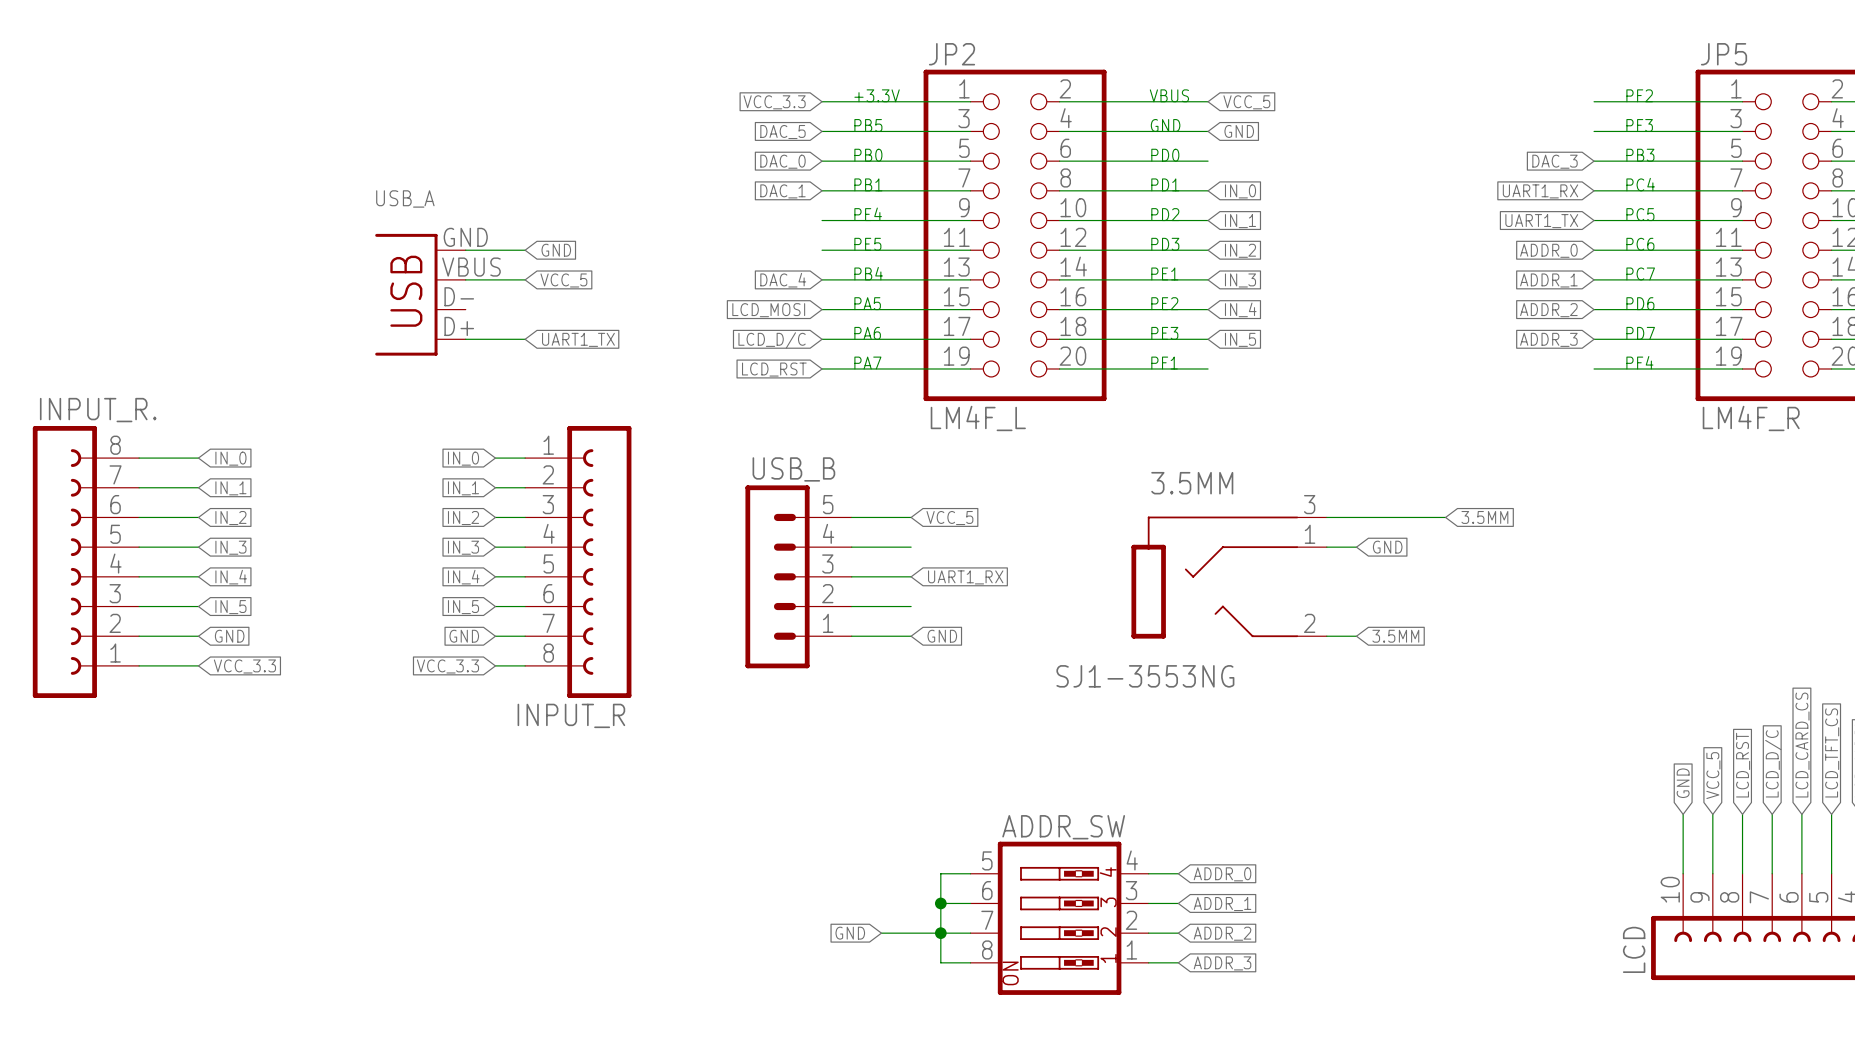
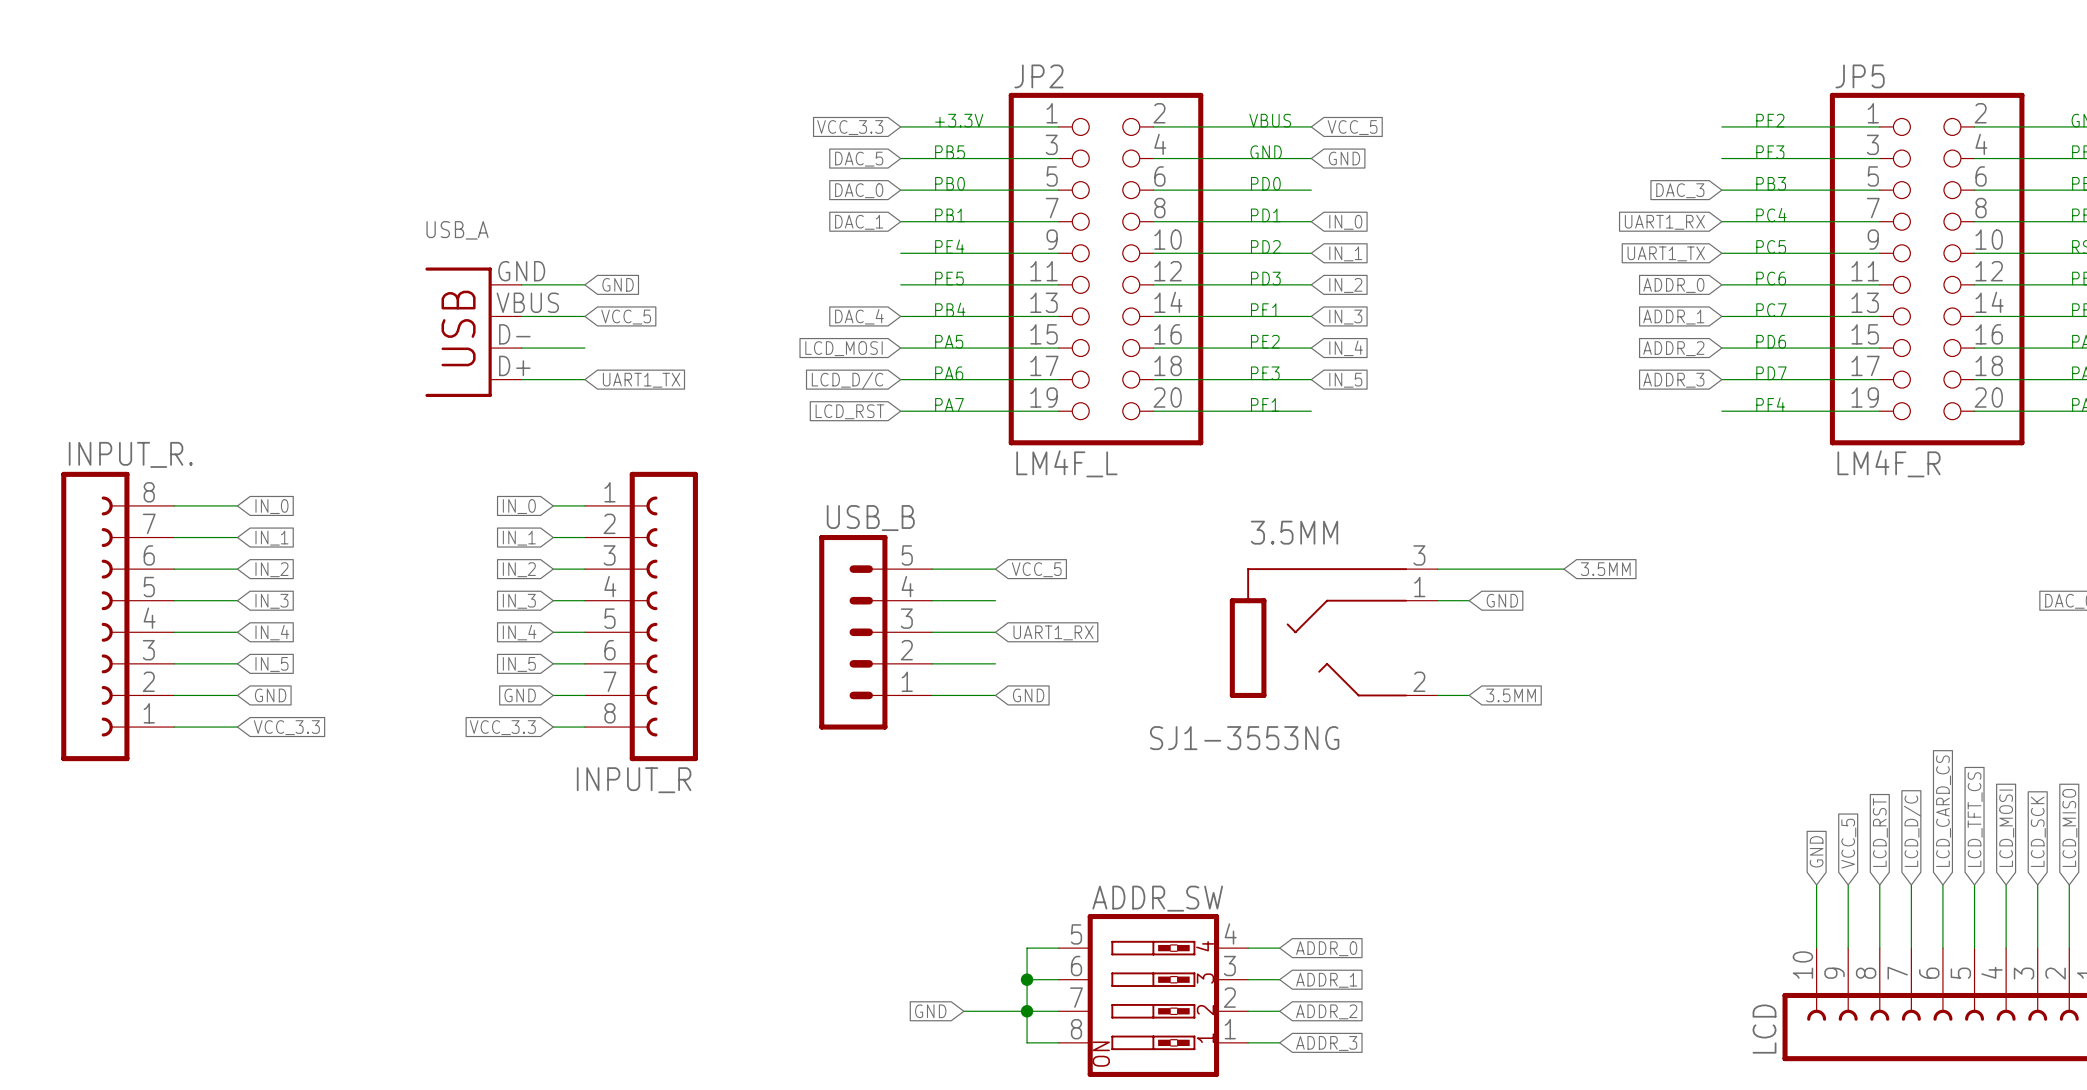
wire: none -> (521, 348) (584, 348)

